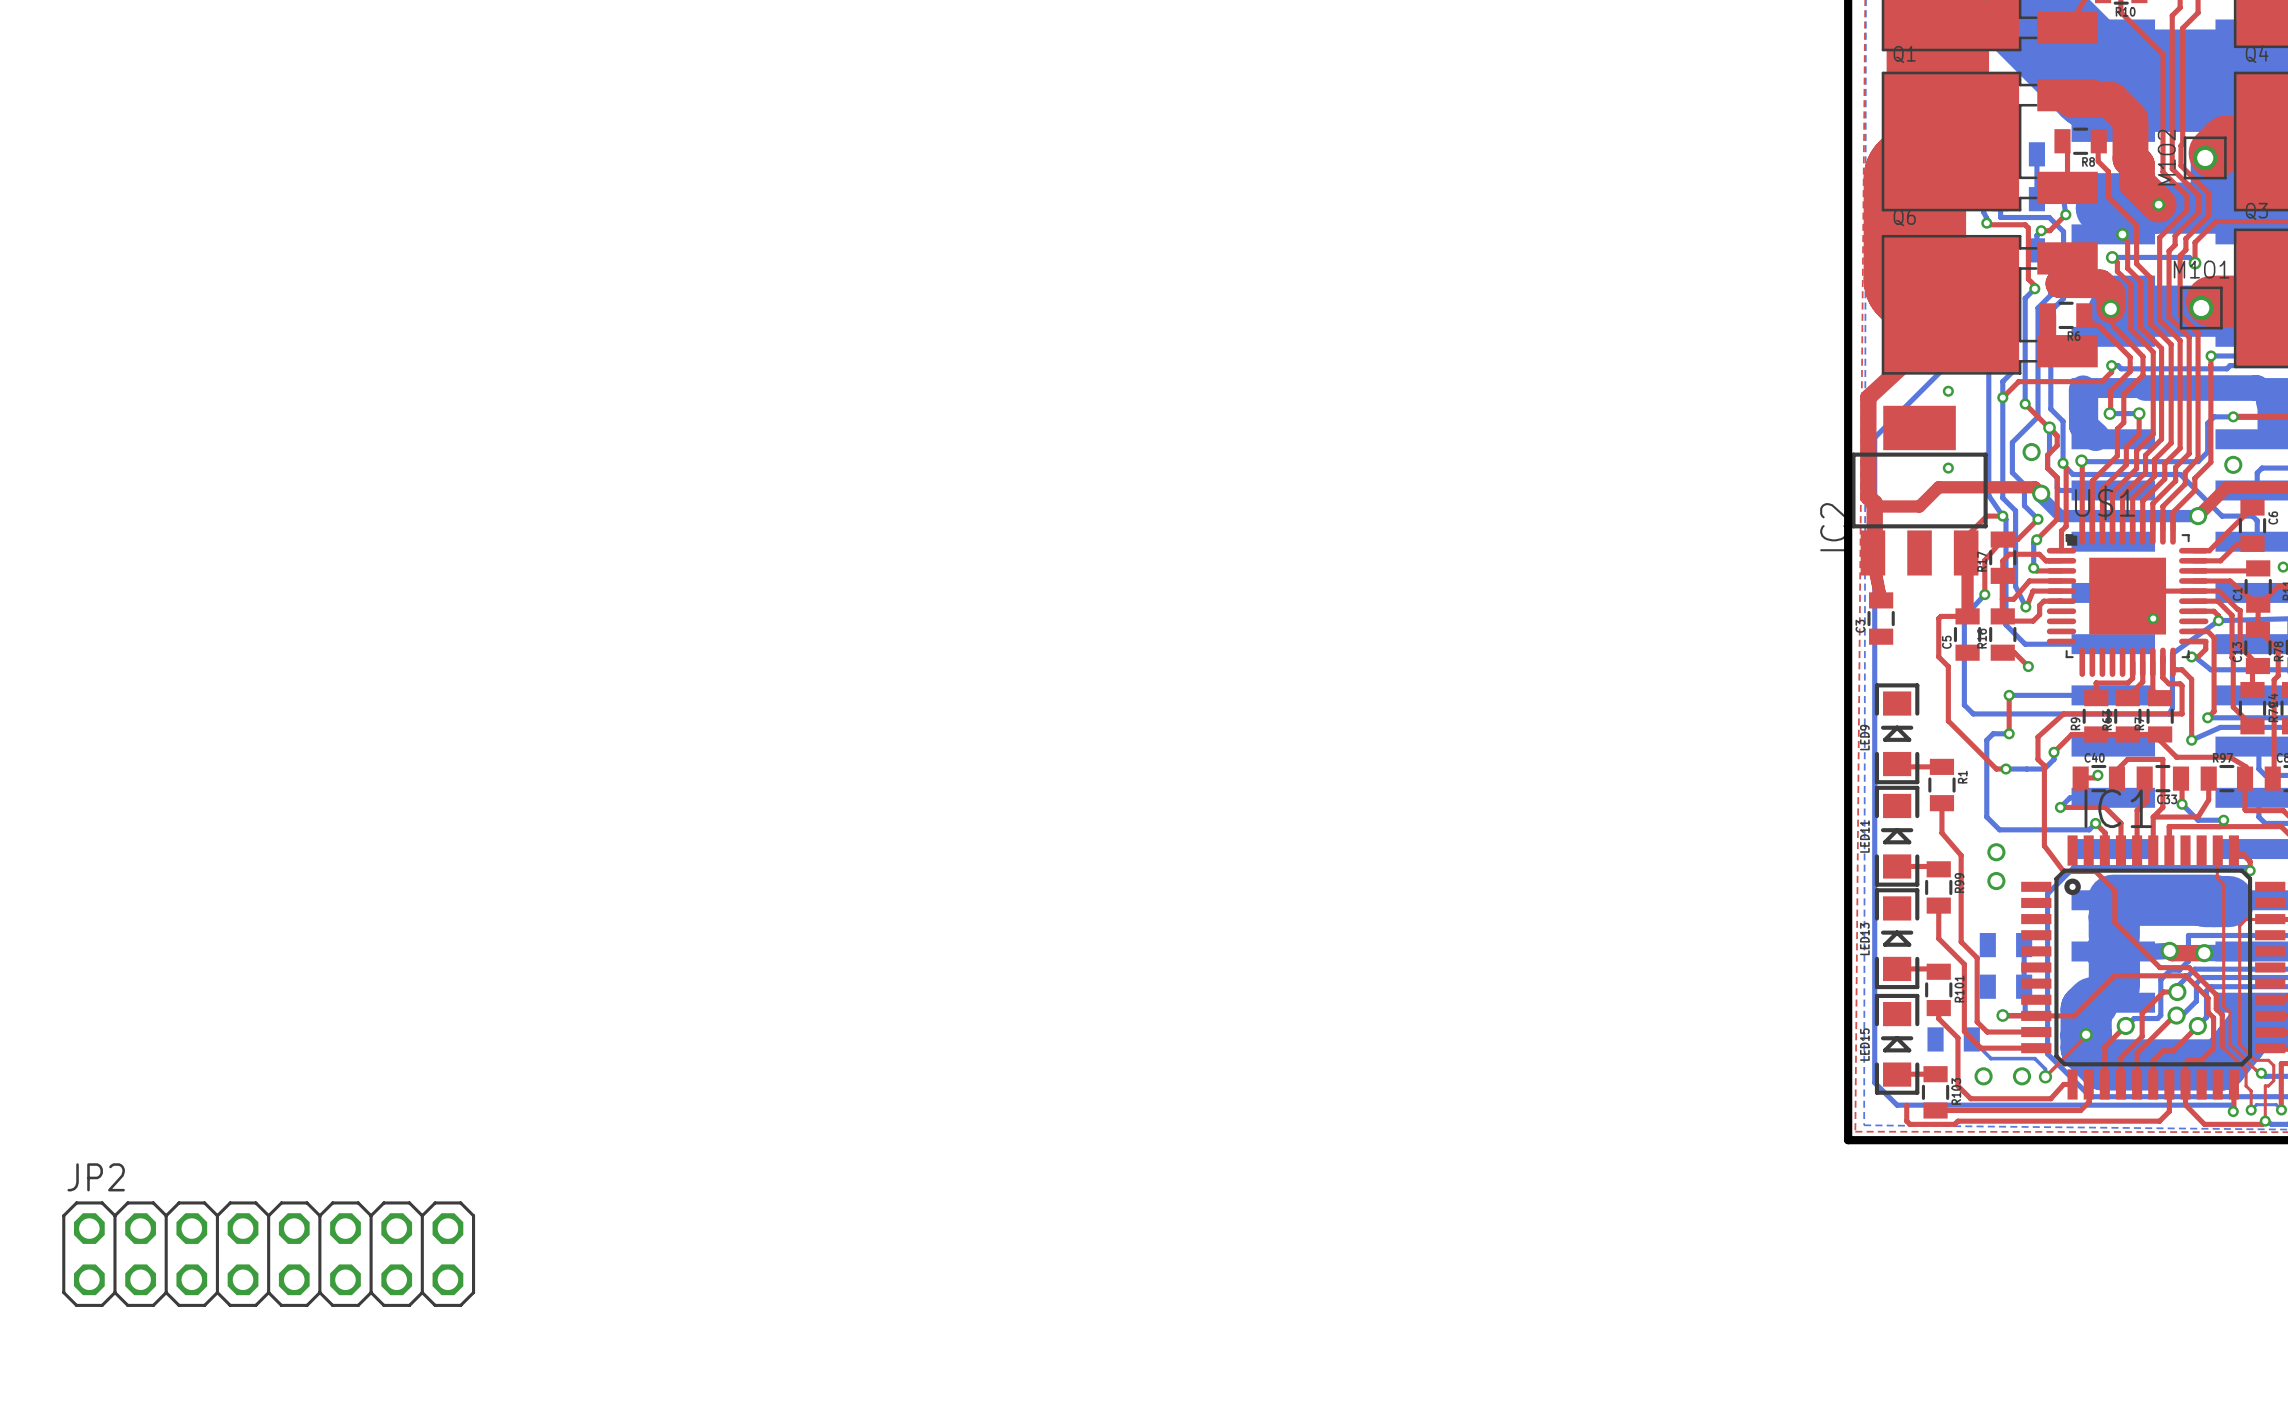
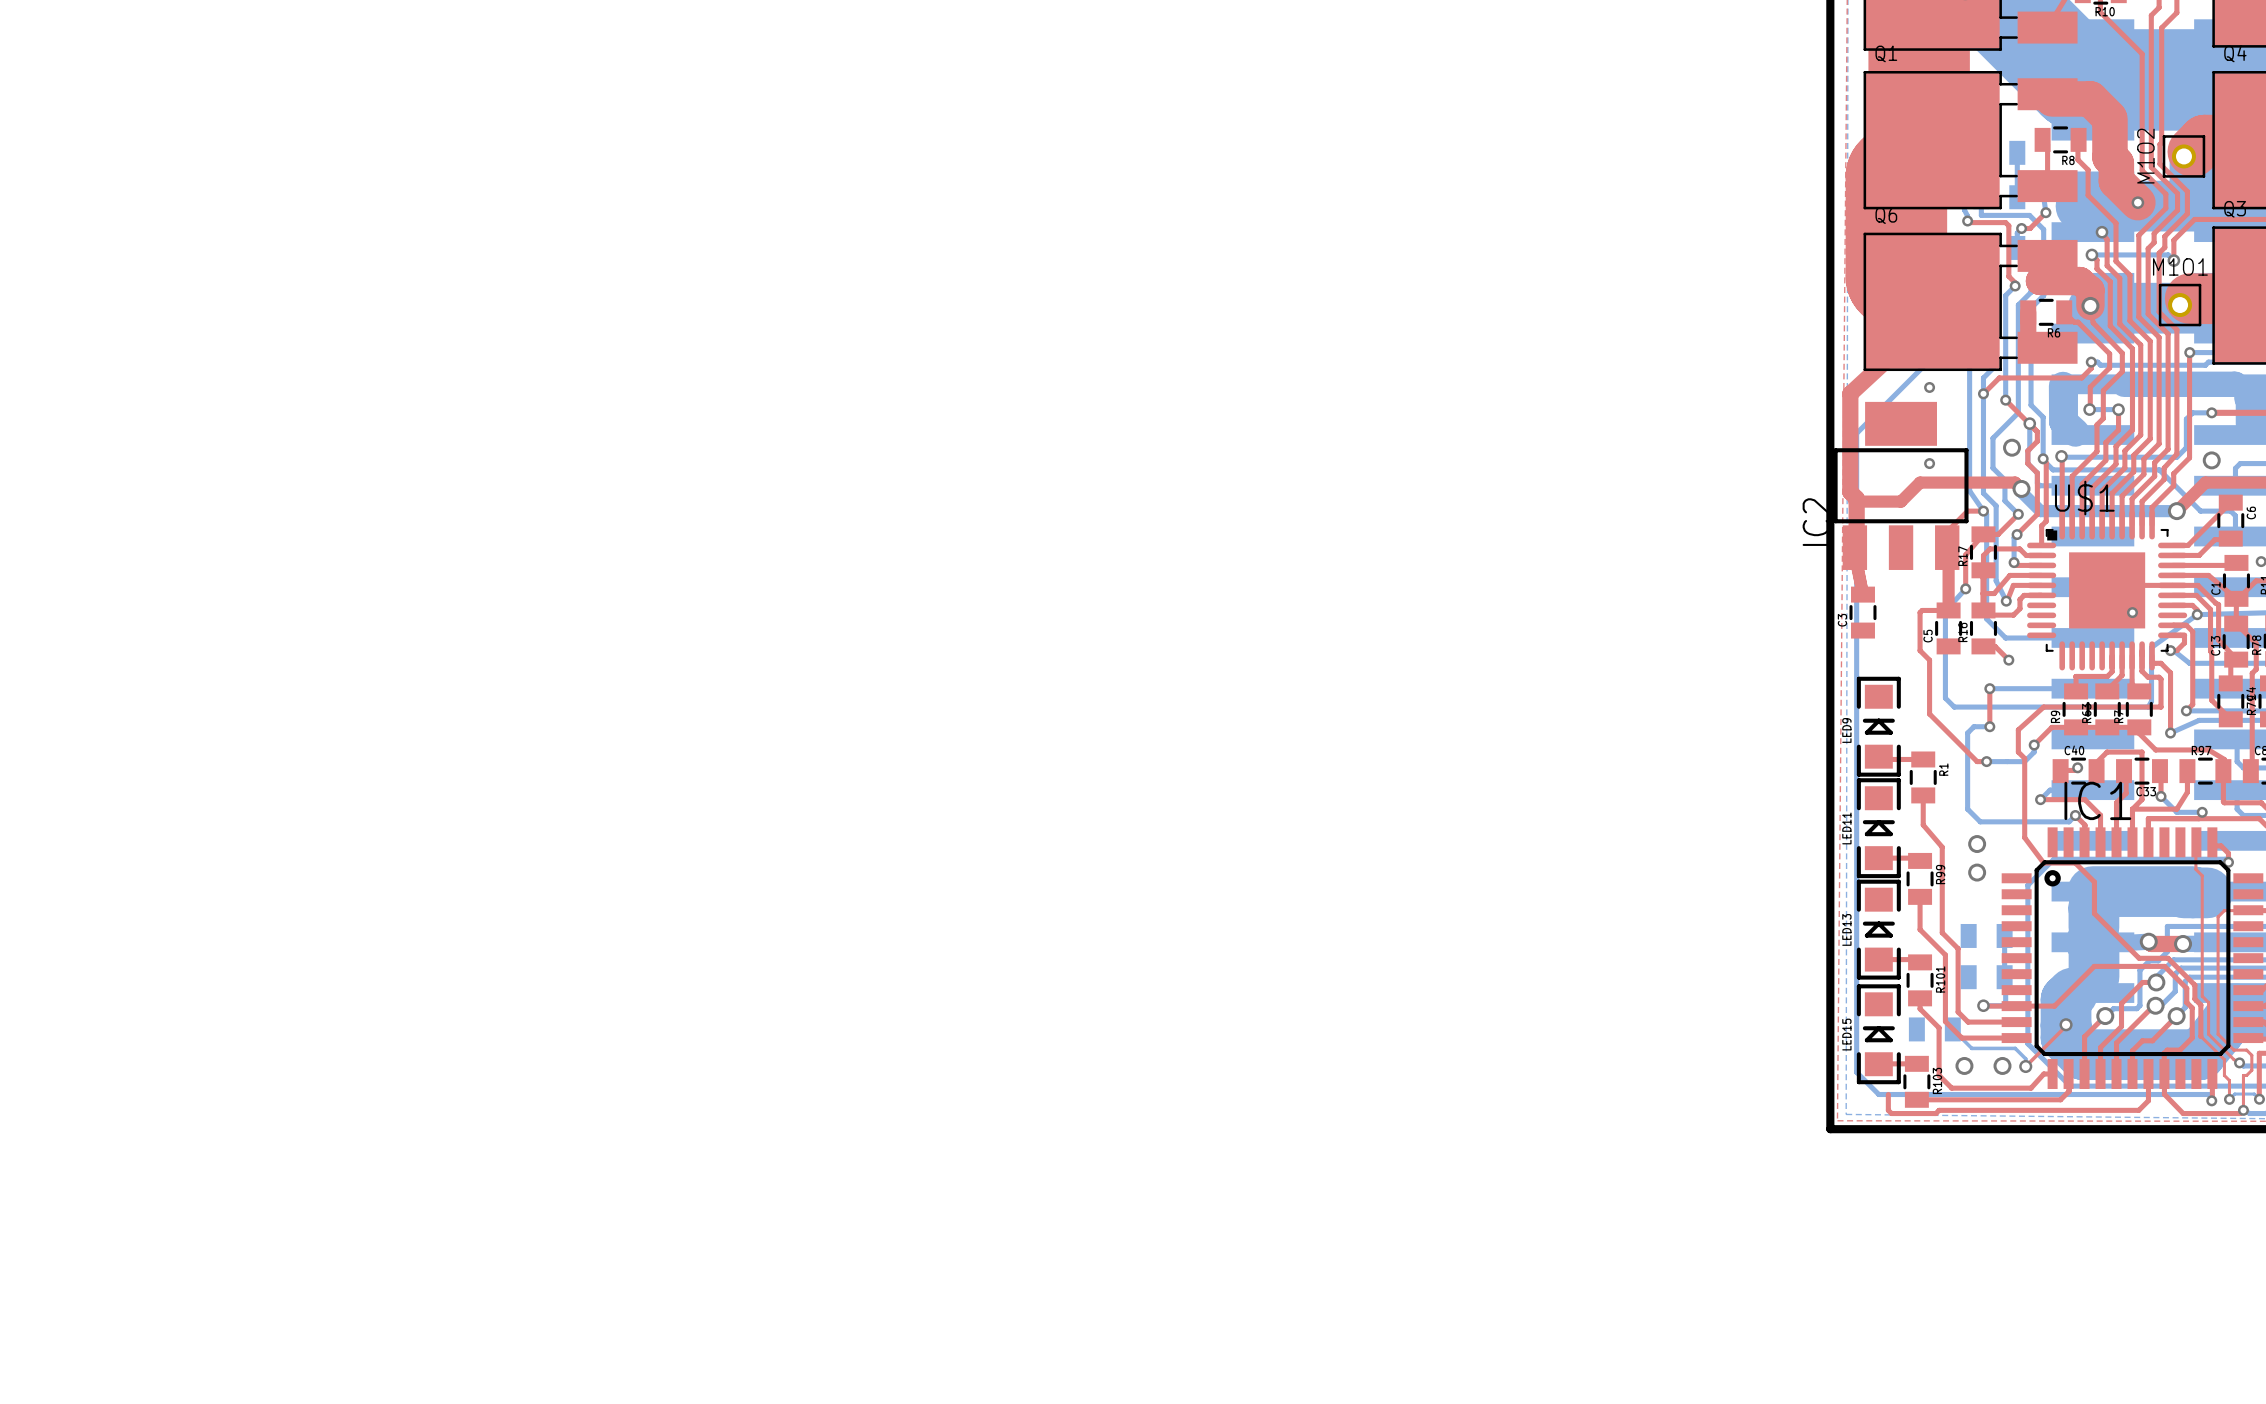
JP2: (268, 1254) -> none

